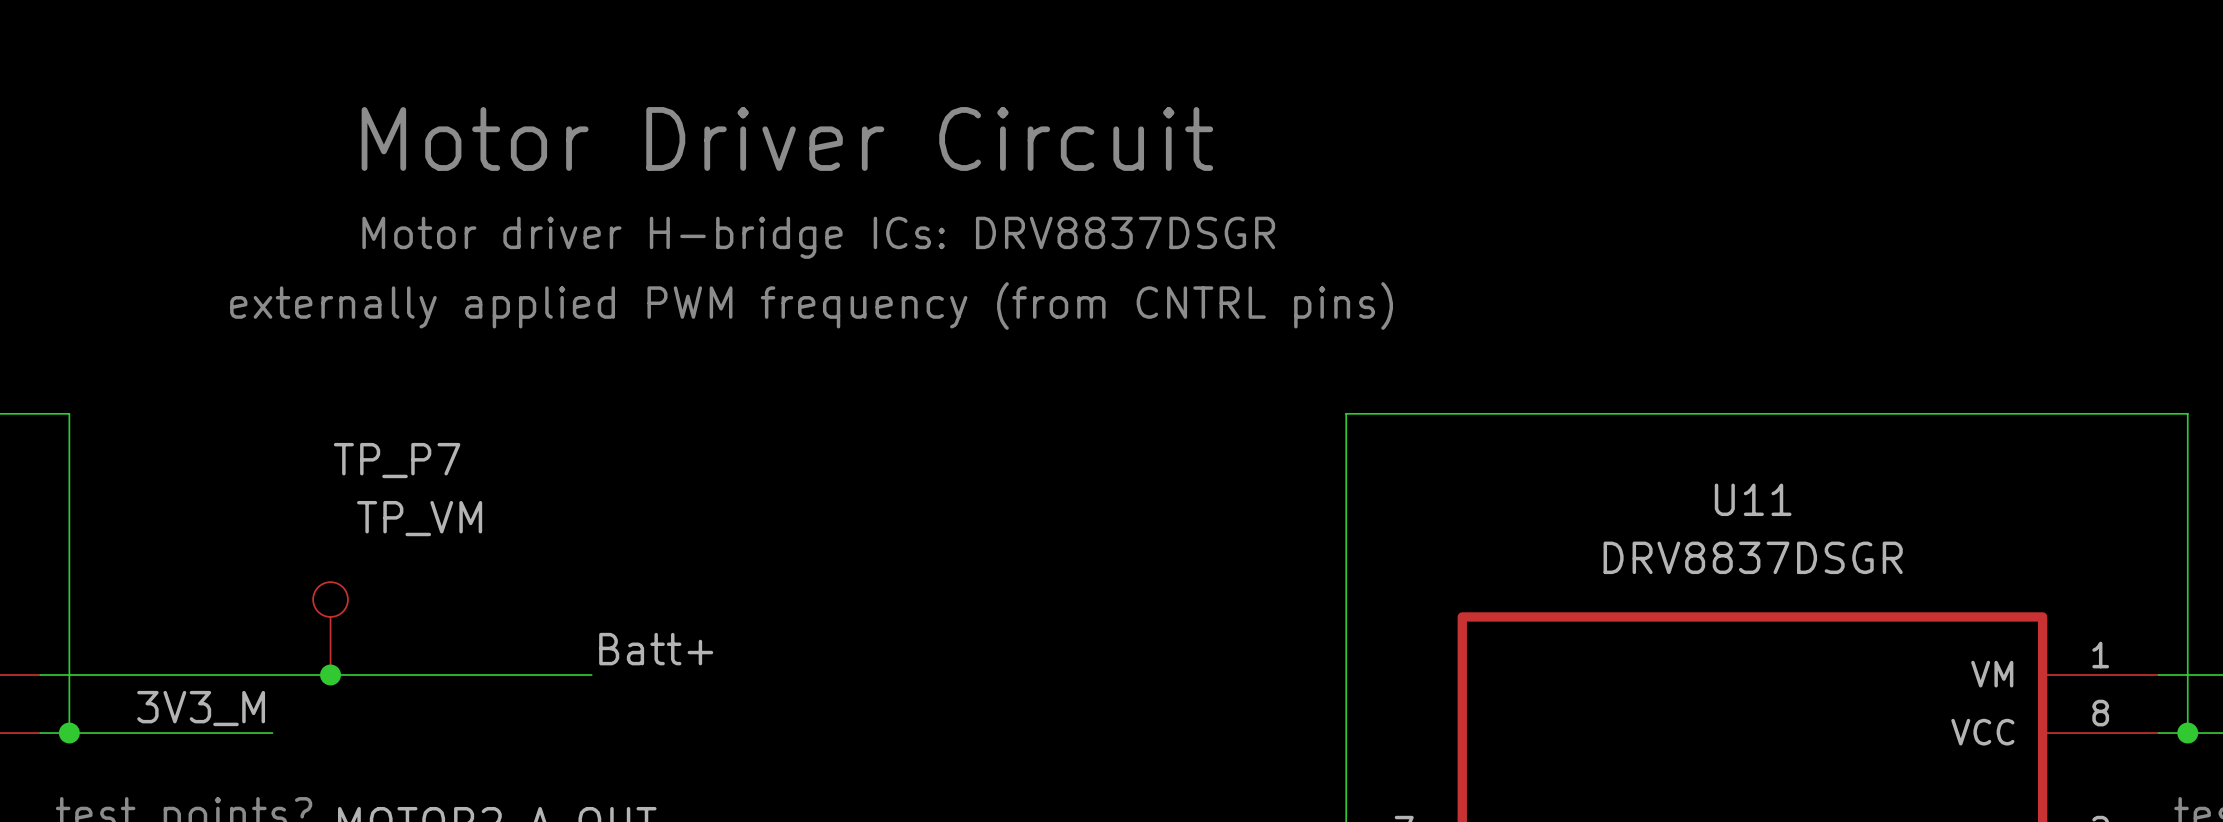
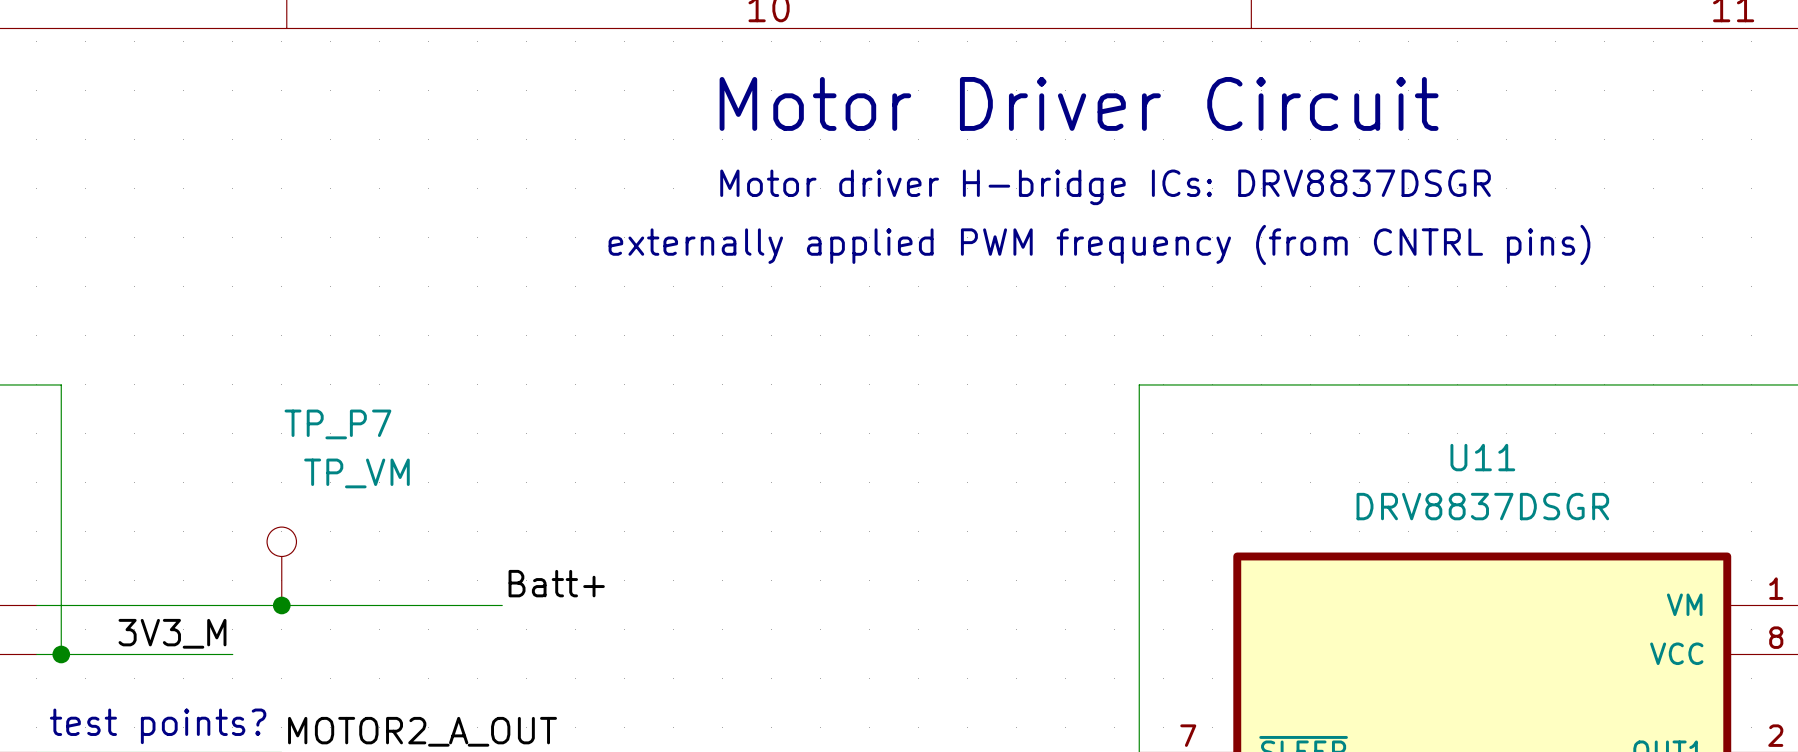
text position: Motor Driver Circuit (787, 138) -> Motor Driver Circuit (1079, 103)
text position: Motor driver H-bridge ICs: DRV8837DSGR (818, 237) -> Motor driver H-bridge ICs: DRV8837DSGR (1105, 187)
text position: externally applied PWM frequency (from CNTRL pins) (811, 306) -> externally applied PWM frequency (from CNTRL pins) (1099, 244)

